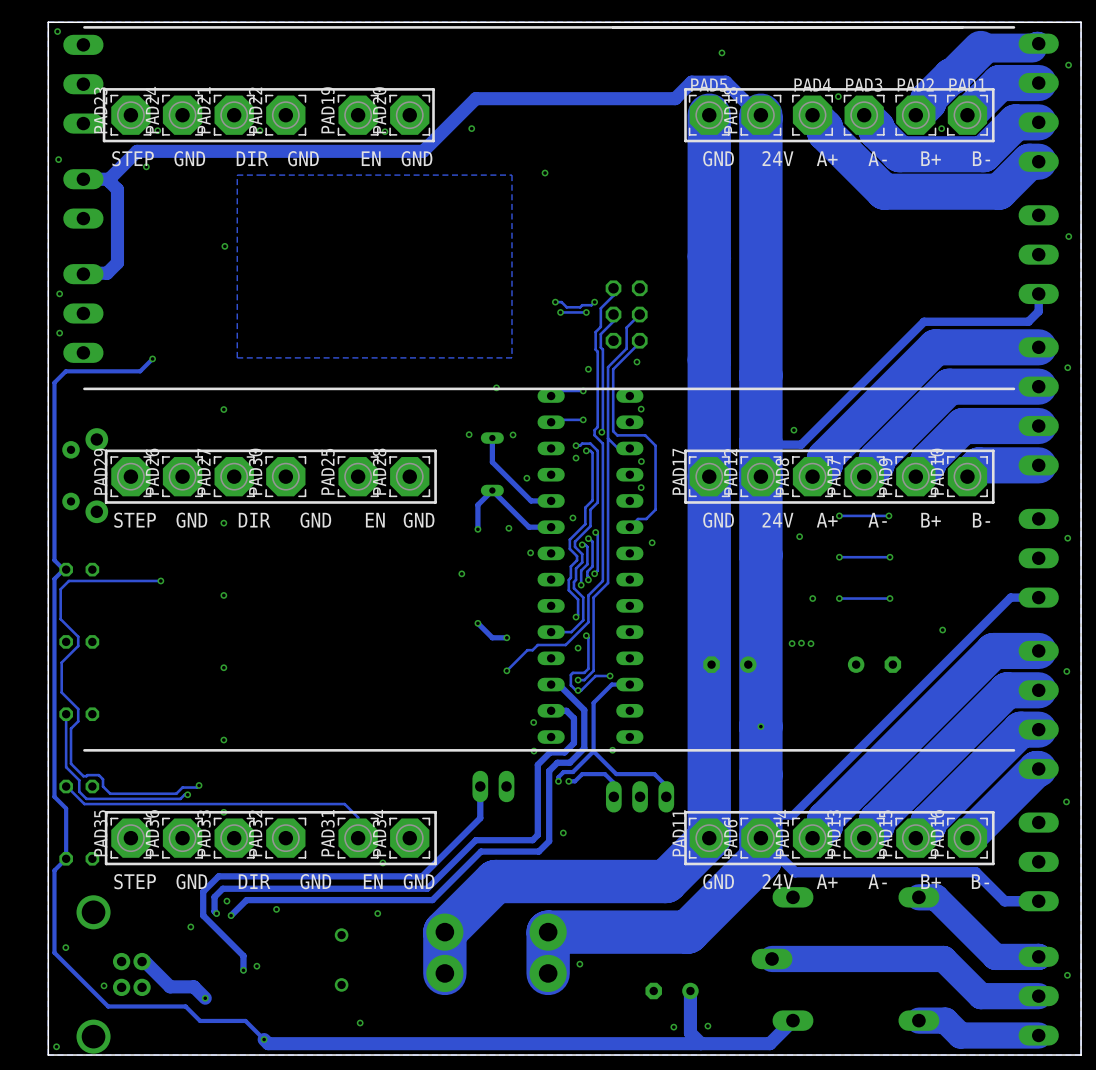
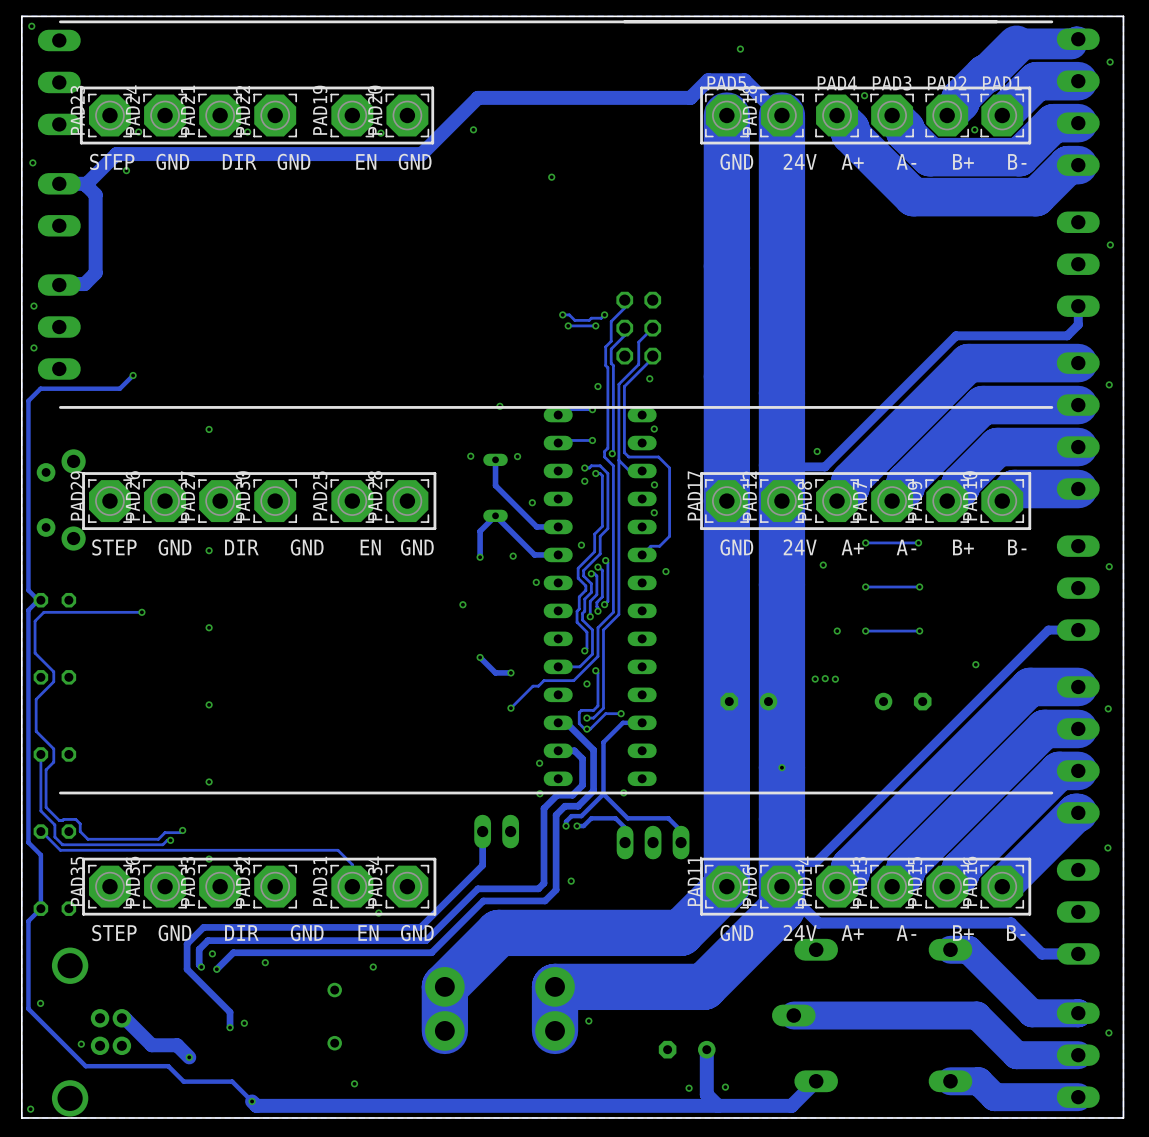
zone outline: (512, 175) (237, 175) (237, 357) (512, 357) (512, 175) -> none
via: (224, 246) -> none
via: (190, 926) -> none

